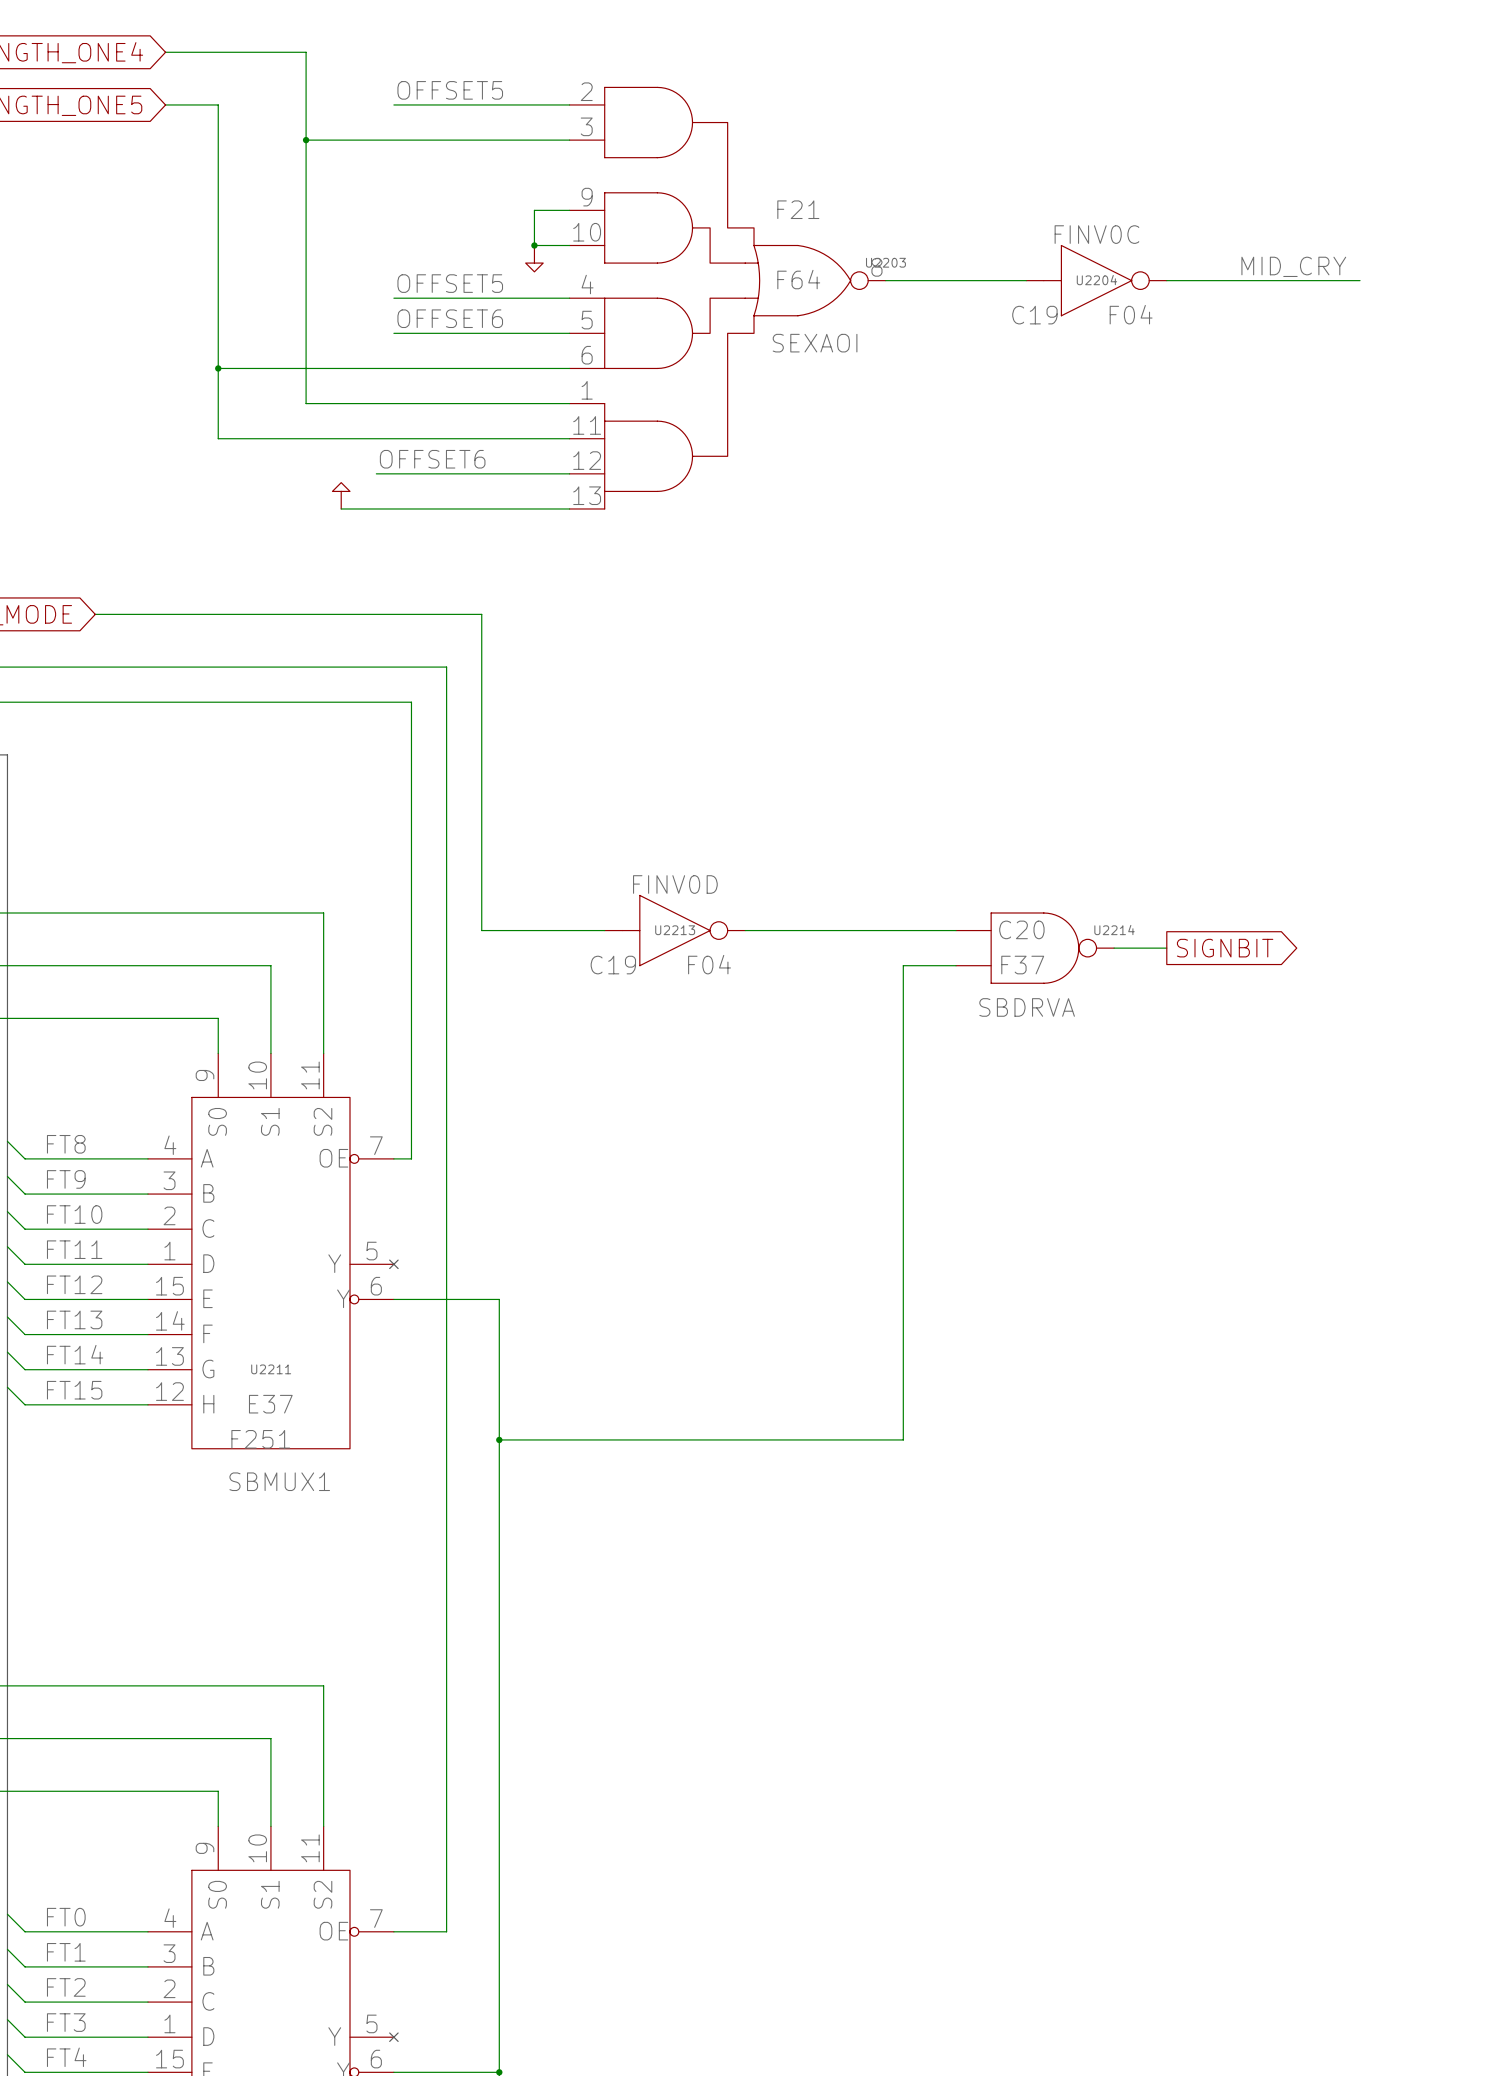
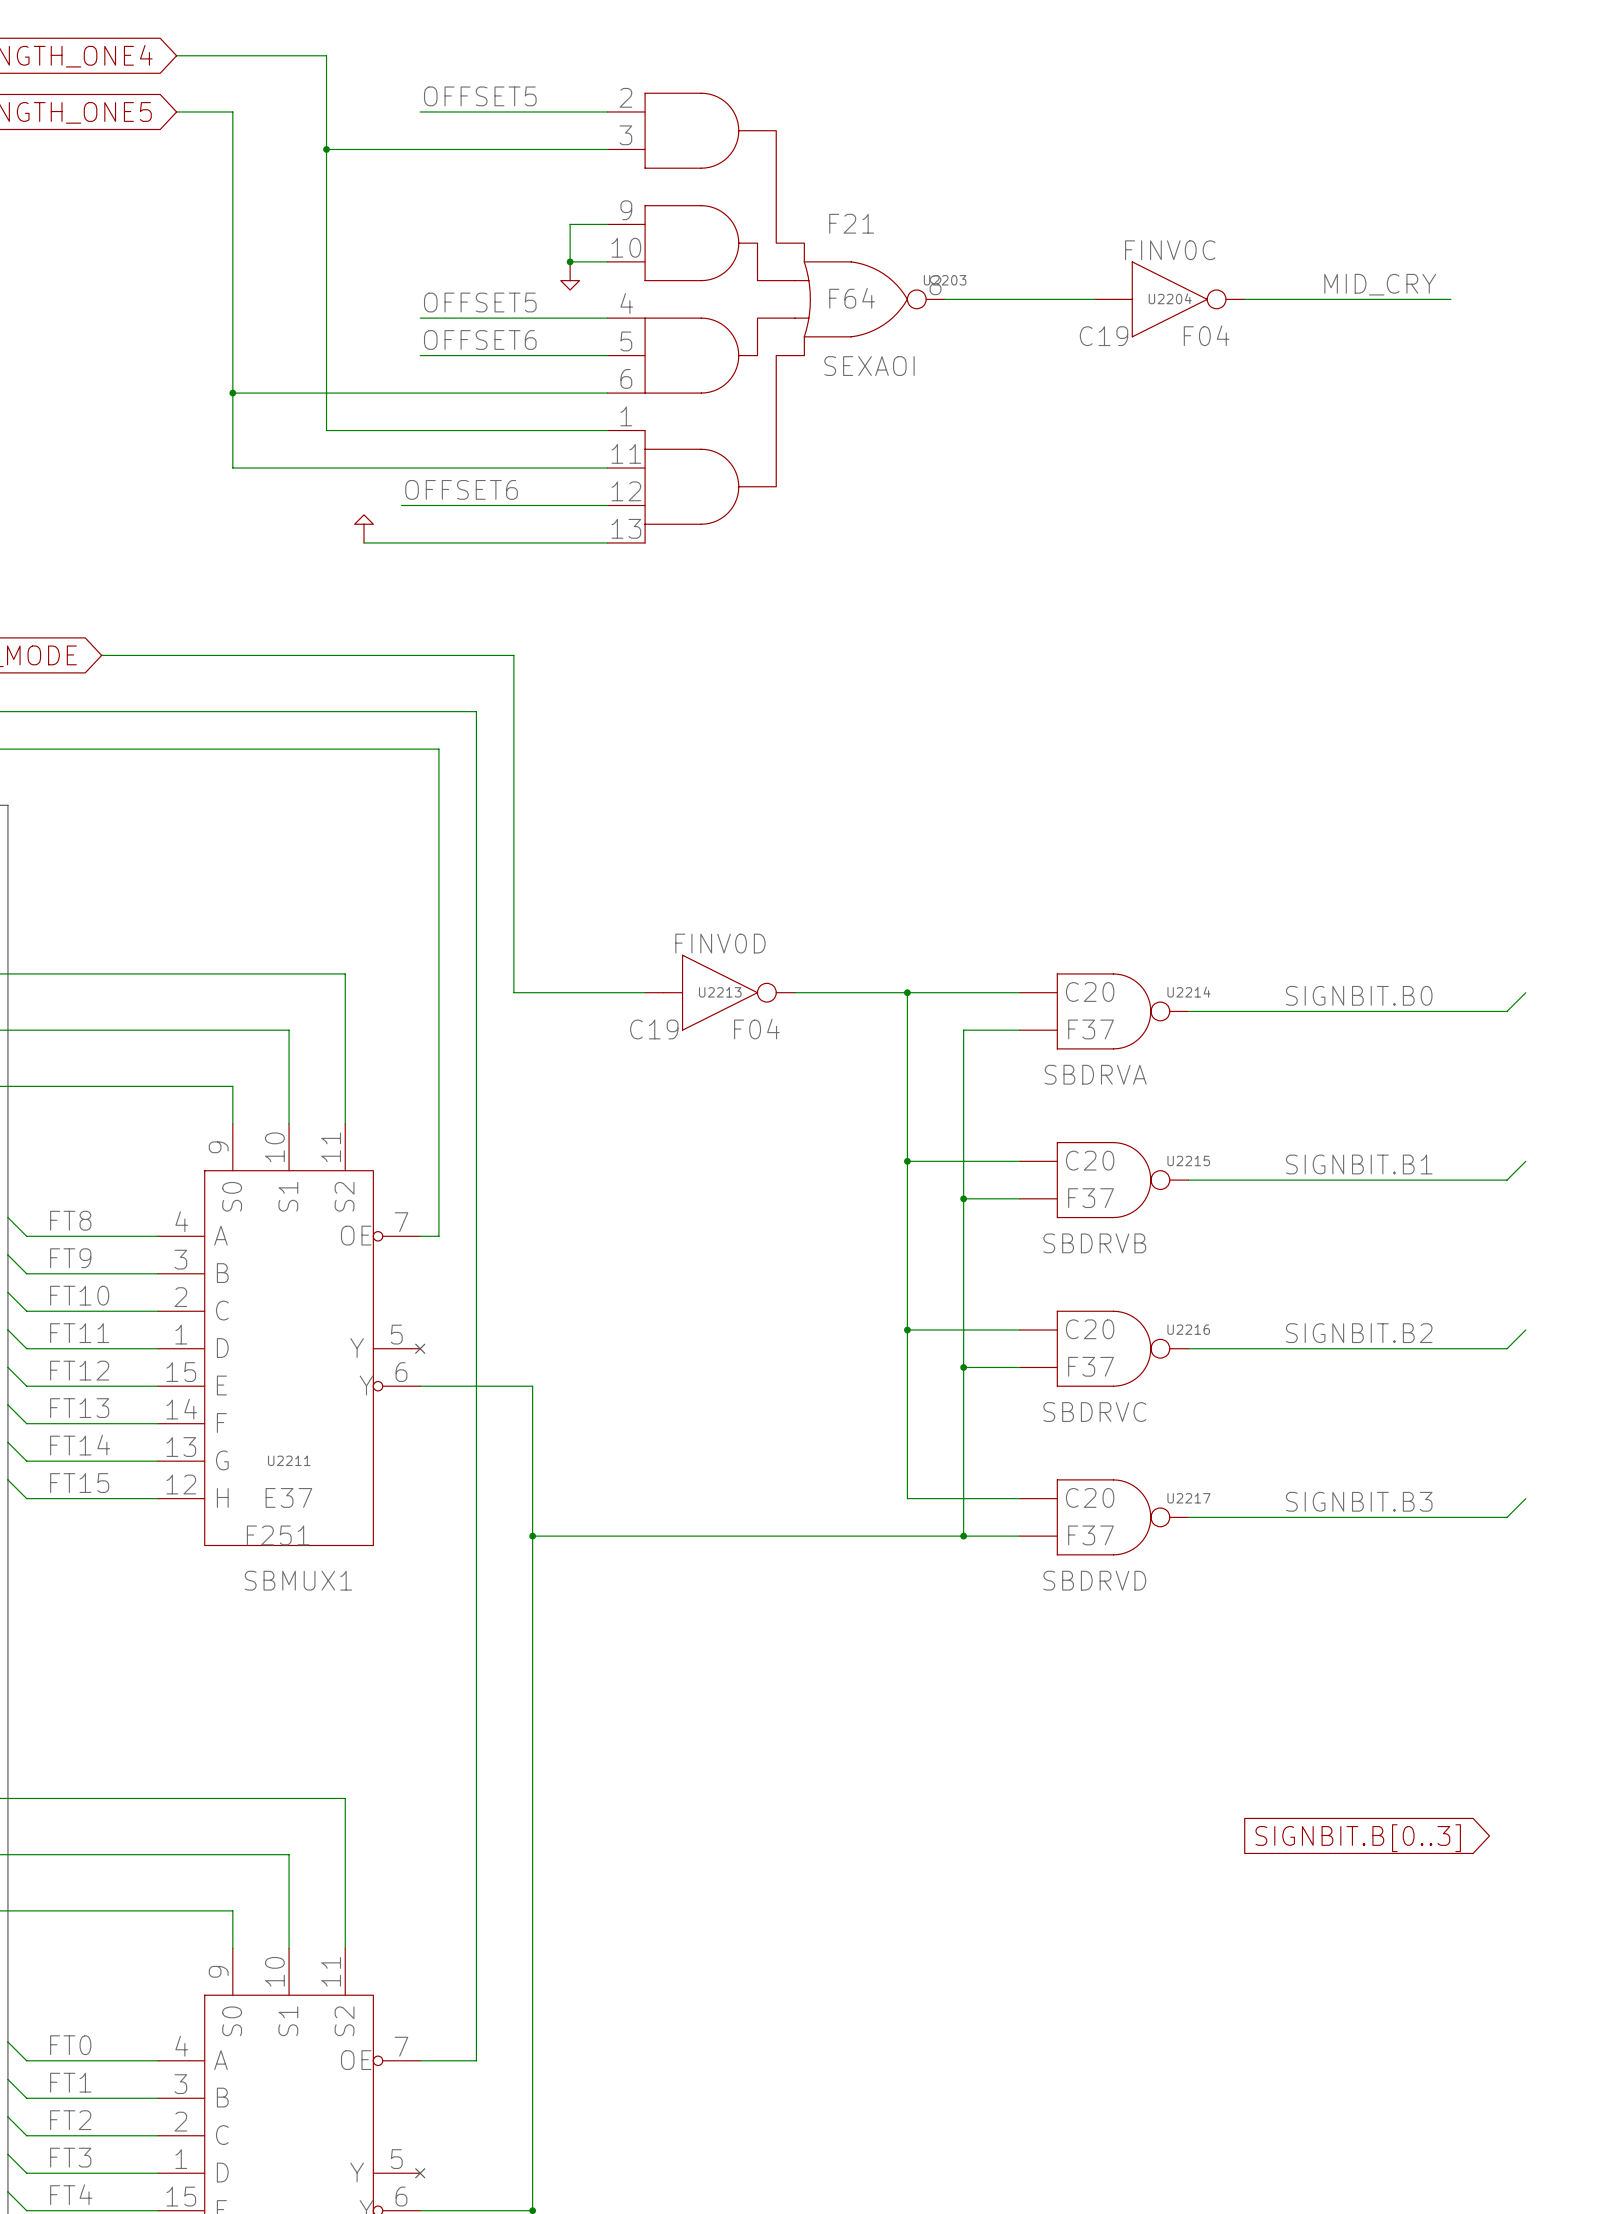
wire: none -> (907, 992) (907, 1498) (1019, 1498)
junction: none -> (907, 992)
wire: none -> (1525, 992) (1507, 1011) (1244, 1011)
label: none -> SIGNBIT.B0 (1359, 995)
global label: SIGNBIT (1225, 948) -> none
wire: none -> (907, 1161) (1019, 1161)
junction: none -> (907, 1161)
wire: none -> (1525, 1161) (1507, 1180) (1188, 1180)
label: none -> SIGNBIT.B1 (1359, 1164)
U2215: none -> F37 (1104, 1180)
wire: none -> (963, 1198) (1019, 1198)
junction: none -> (963, 1198)
wire: none -> (907, 1329) (1019, 1329)
junction: none -> (907, 1329)
wire: none -> (1525, 1329) (1507, 1348) (1188, 1348)
label: none -> SIGNBIT.B2 (1359, 1333)
U2216: none -> F37 (1104, 1348)
wire: none -> (963, 1367) (1019, 1367)
junction: none -> (963, 1367)
wire: none -> (1525, 1498) (1507, 1517) (1188, 1517)
label: none -> SIGNBIT.B3 (1359, 1501)
U2217: none -> F37 (1104, 1517)
wire: none -> (963, 1536) (1019, 1536)
junction: none -> (963, 1536)
global label: none -> SIGNBIT.B[0..3] (1358, 1838)

